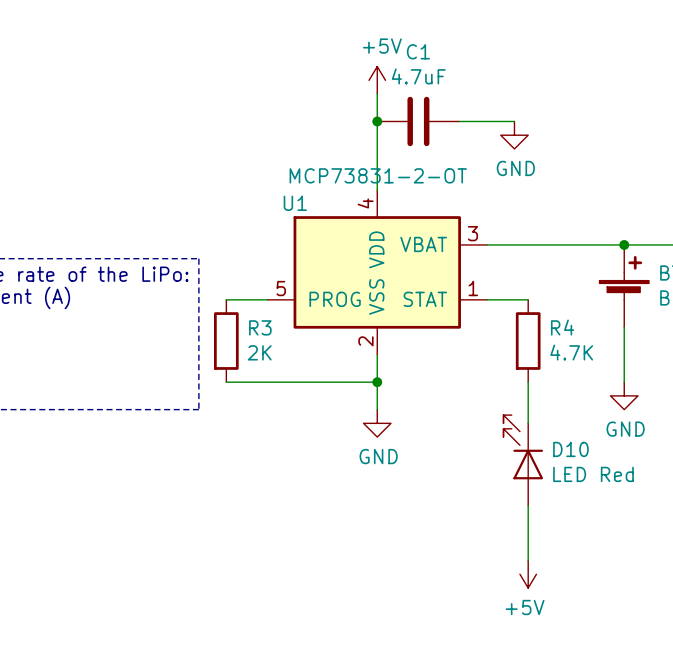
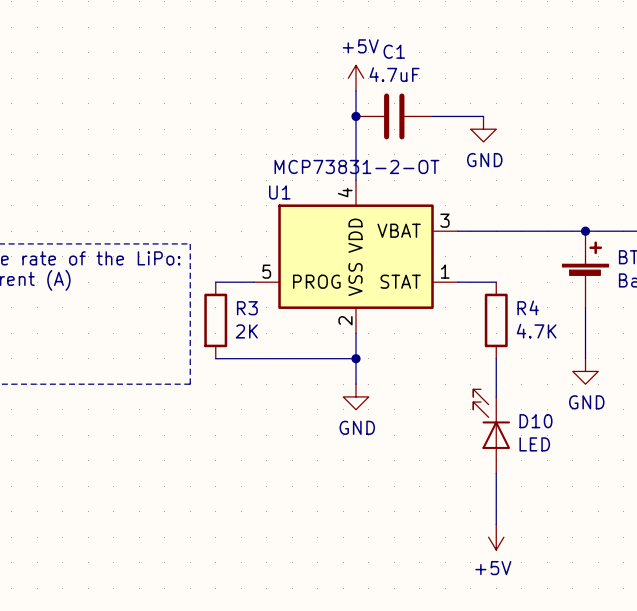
D10 value: LED Red (593, 474) -> LED (534, 444)

